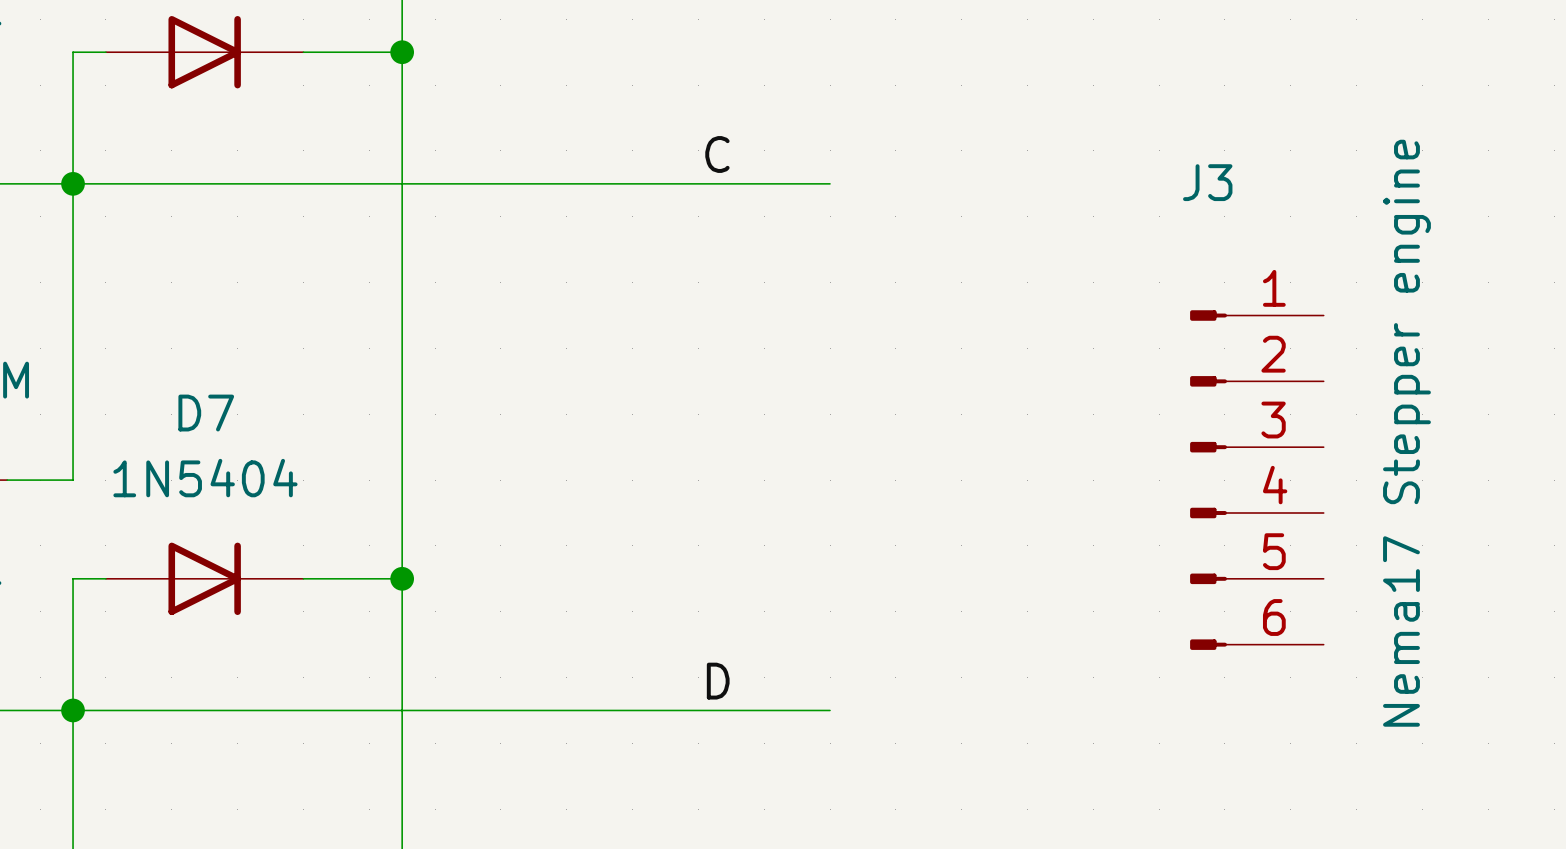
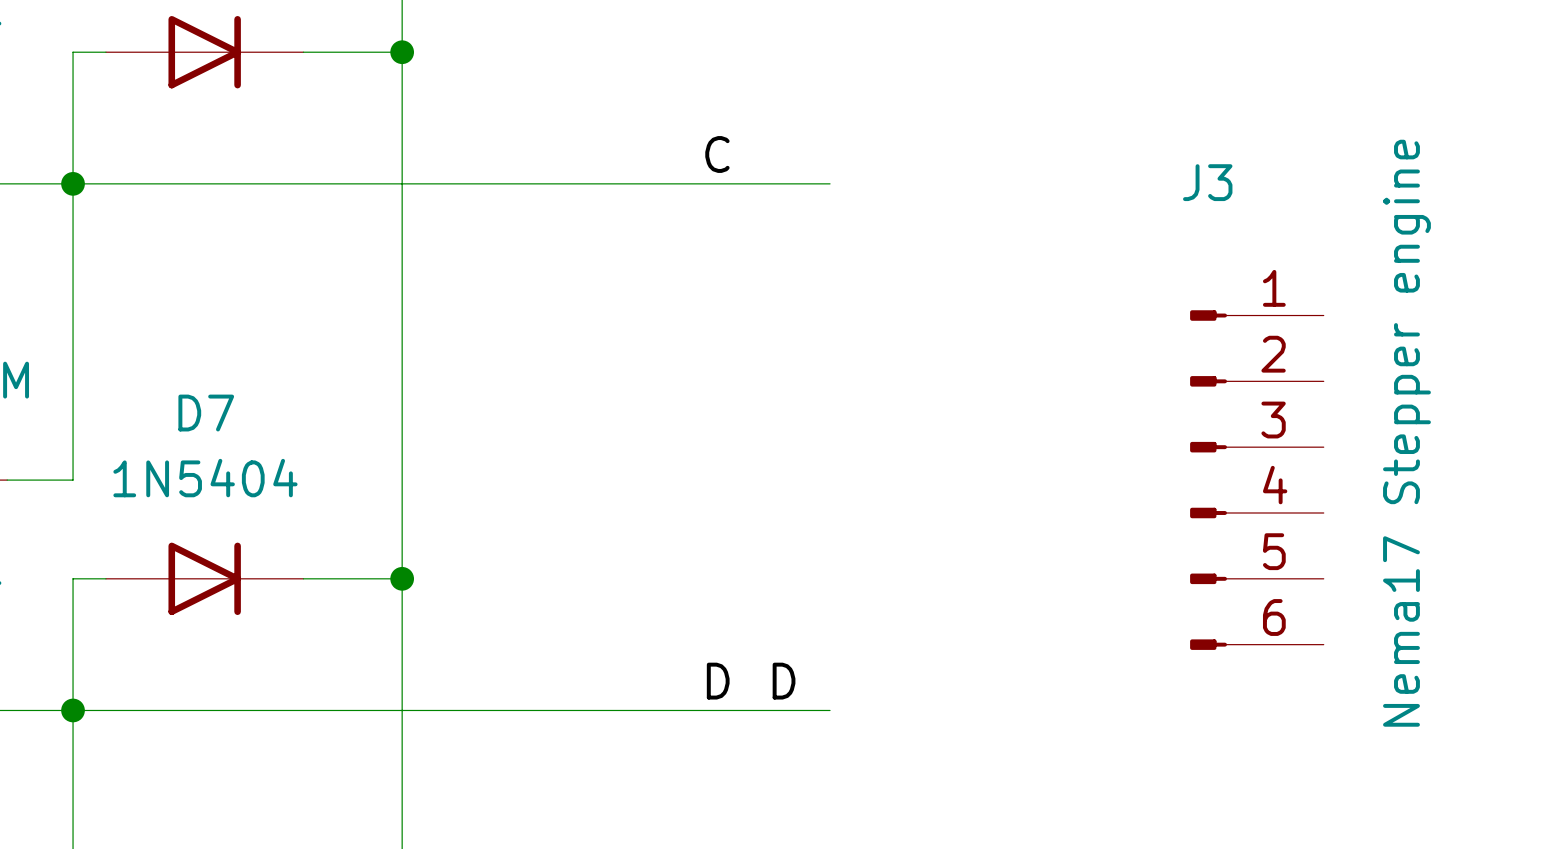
label: none -> D (784, 681)

